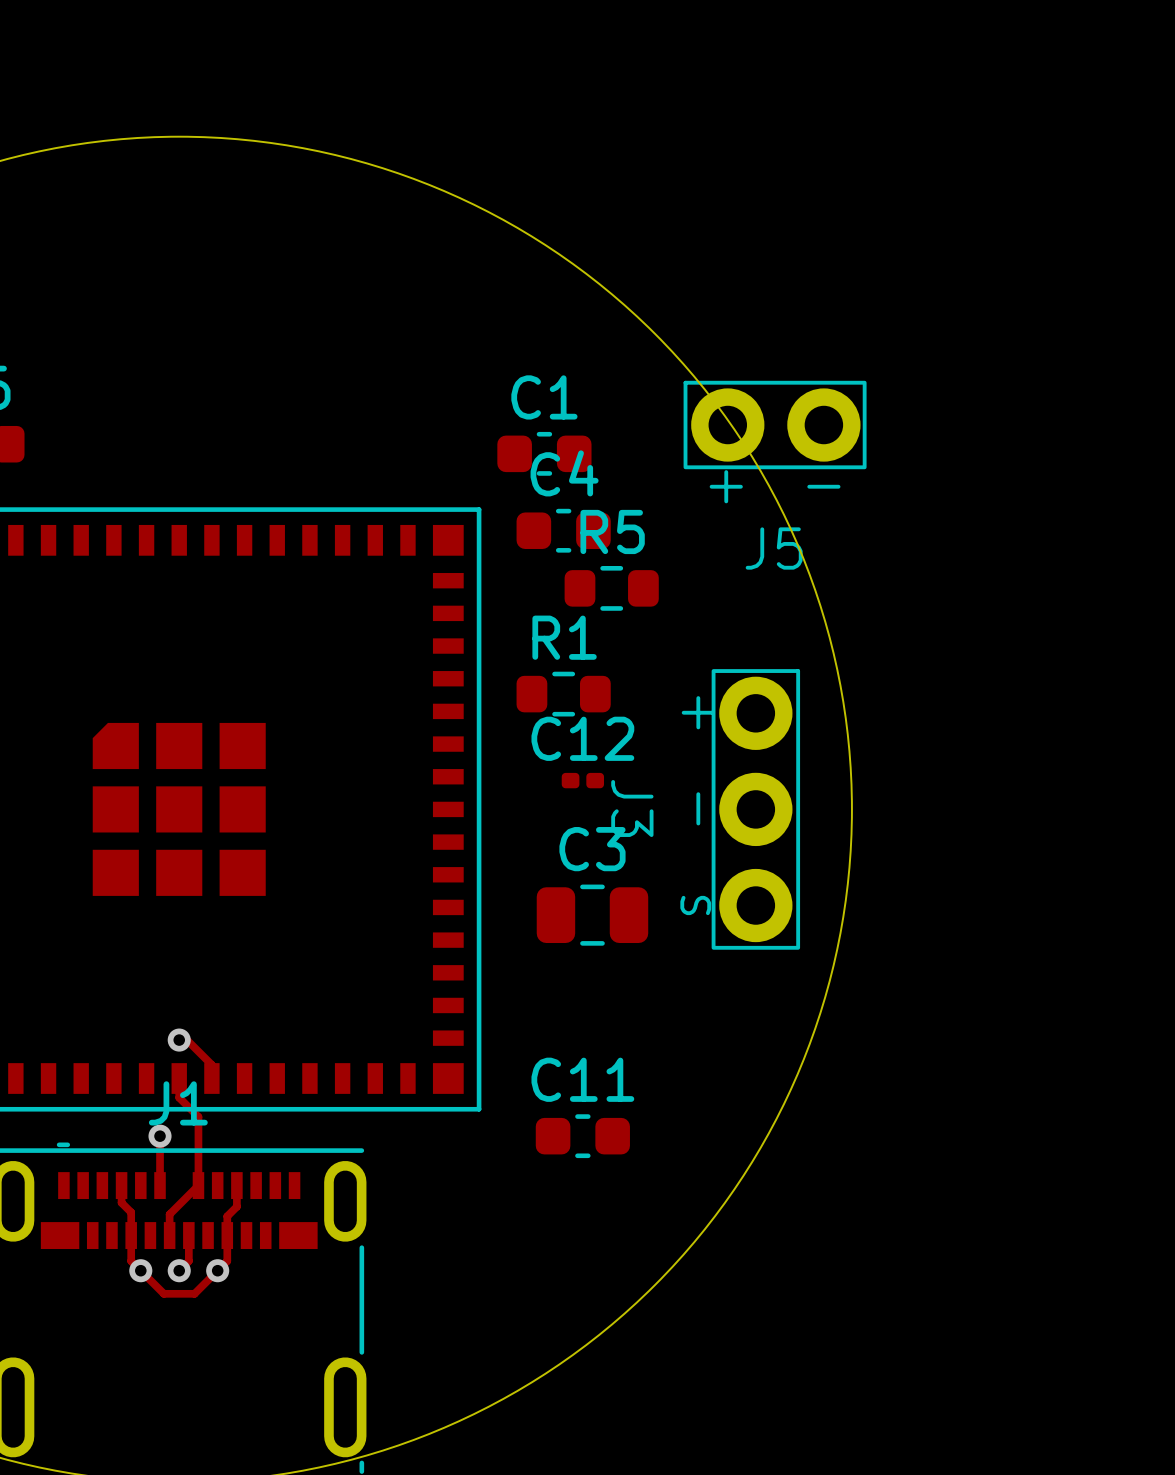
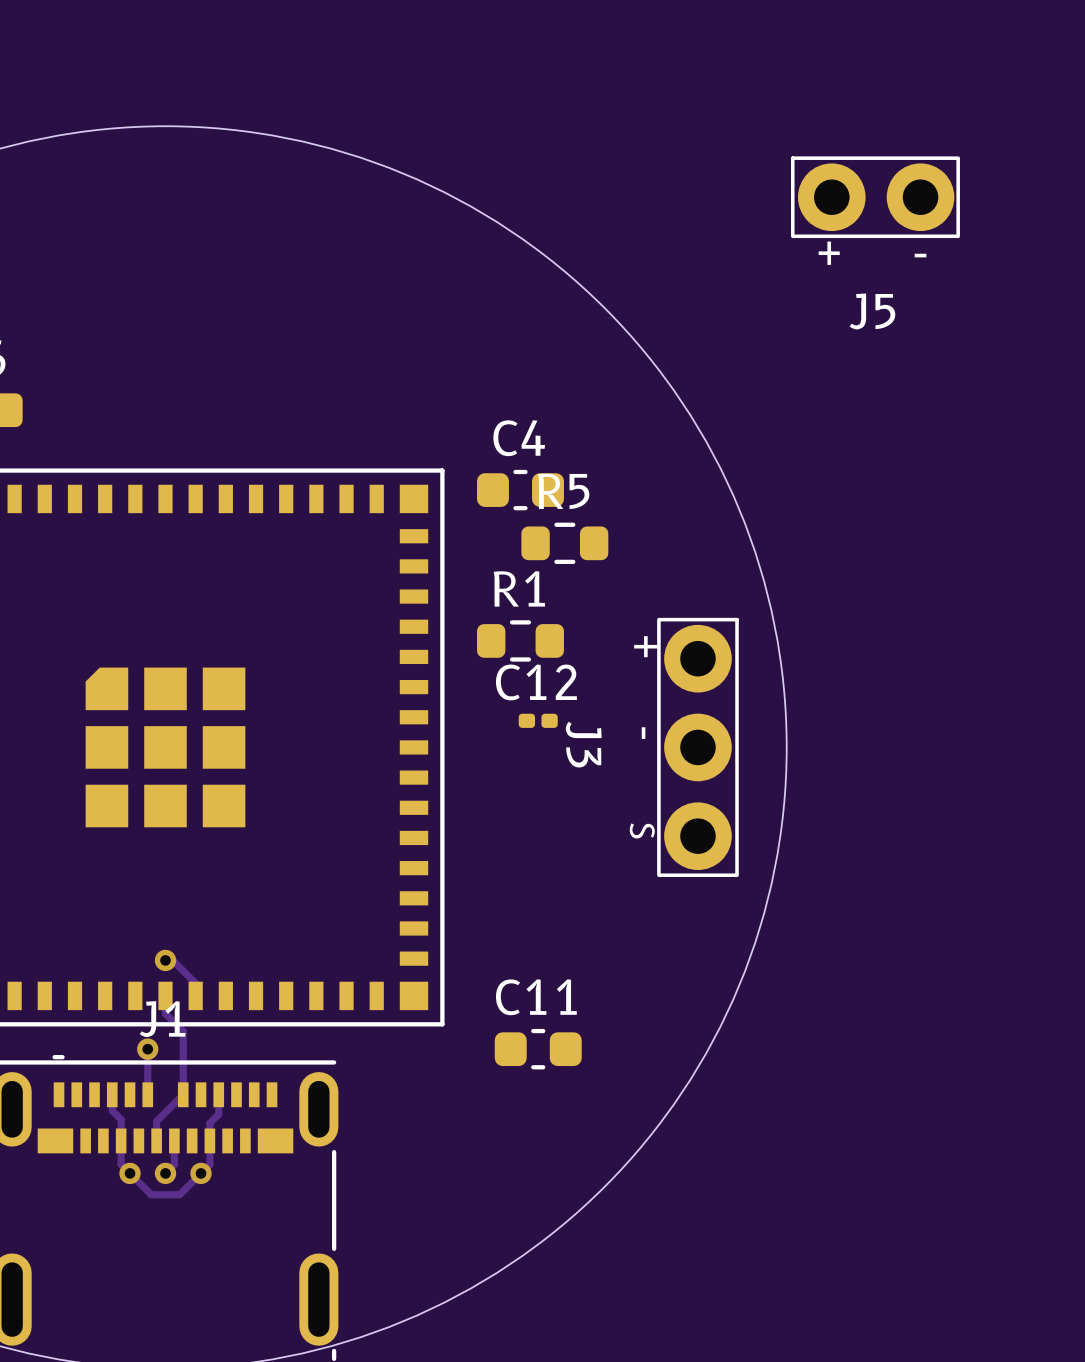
J5 position: (775, 425) -> (875, 197)
C1: (544, 453) -> none
C3: (592, 915) -> none

